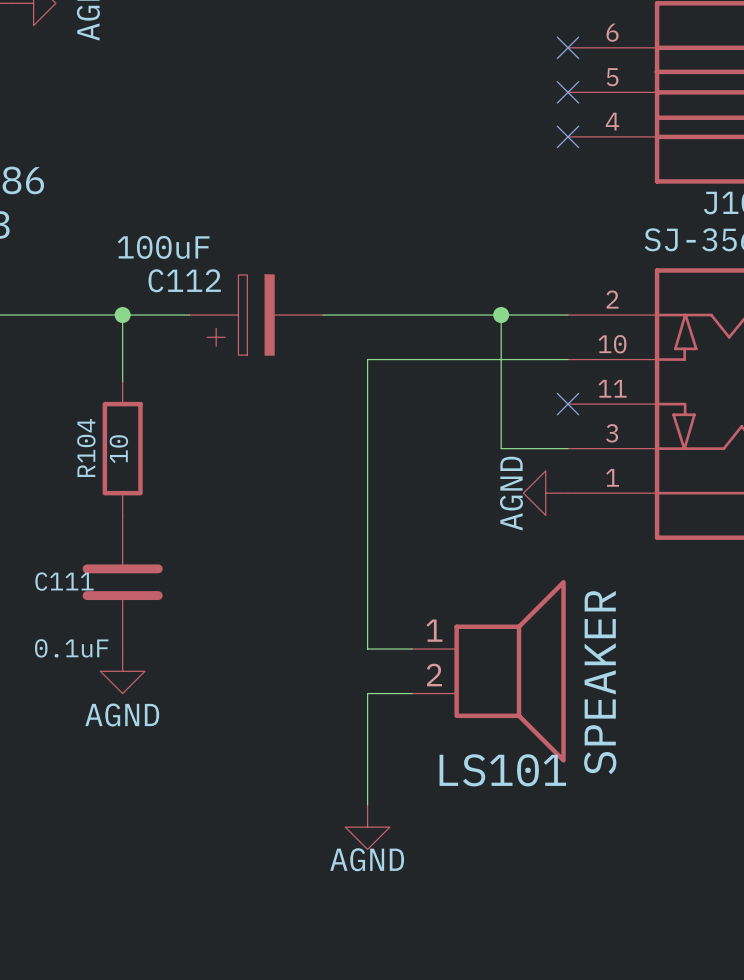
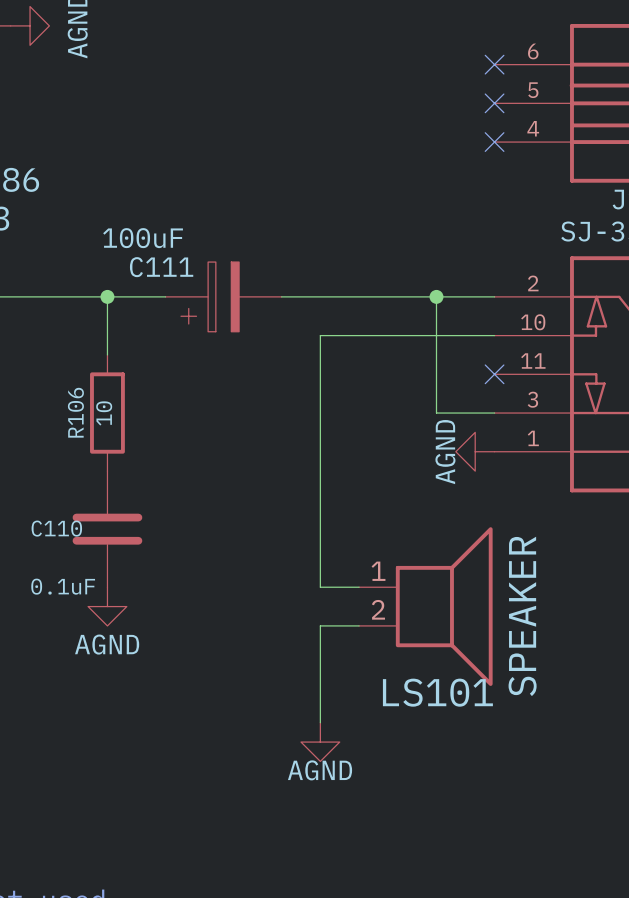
C112 name: C112 (184, 280) -> C111 (161, 267)
R104 name: R104 (86, 447) -> R106 (75, 412)
C111 name: C111 (64, 581) -> C110 (56, 528)

